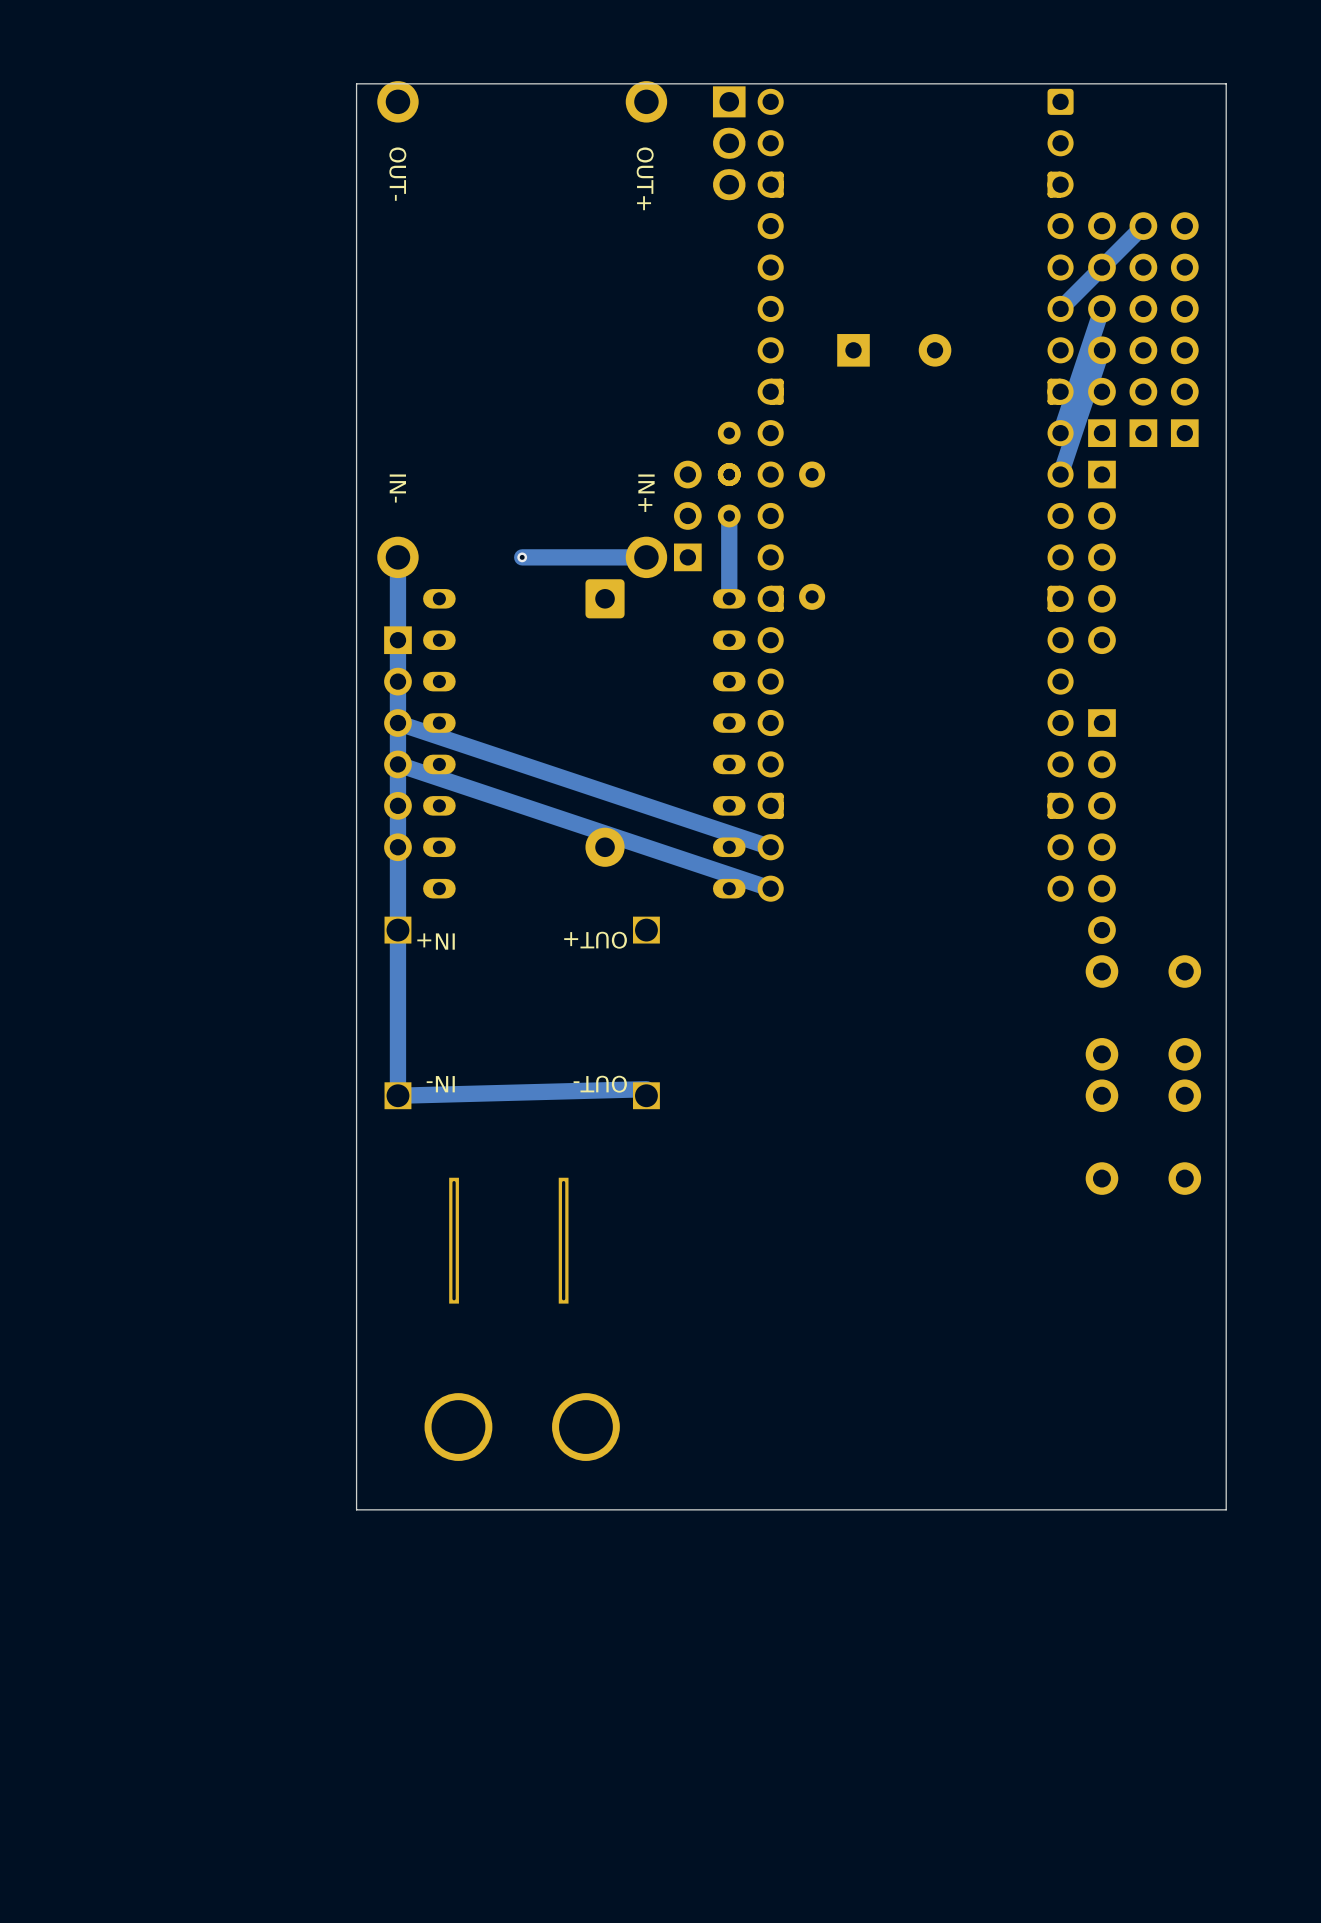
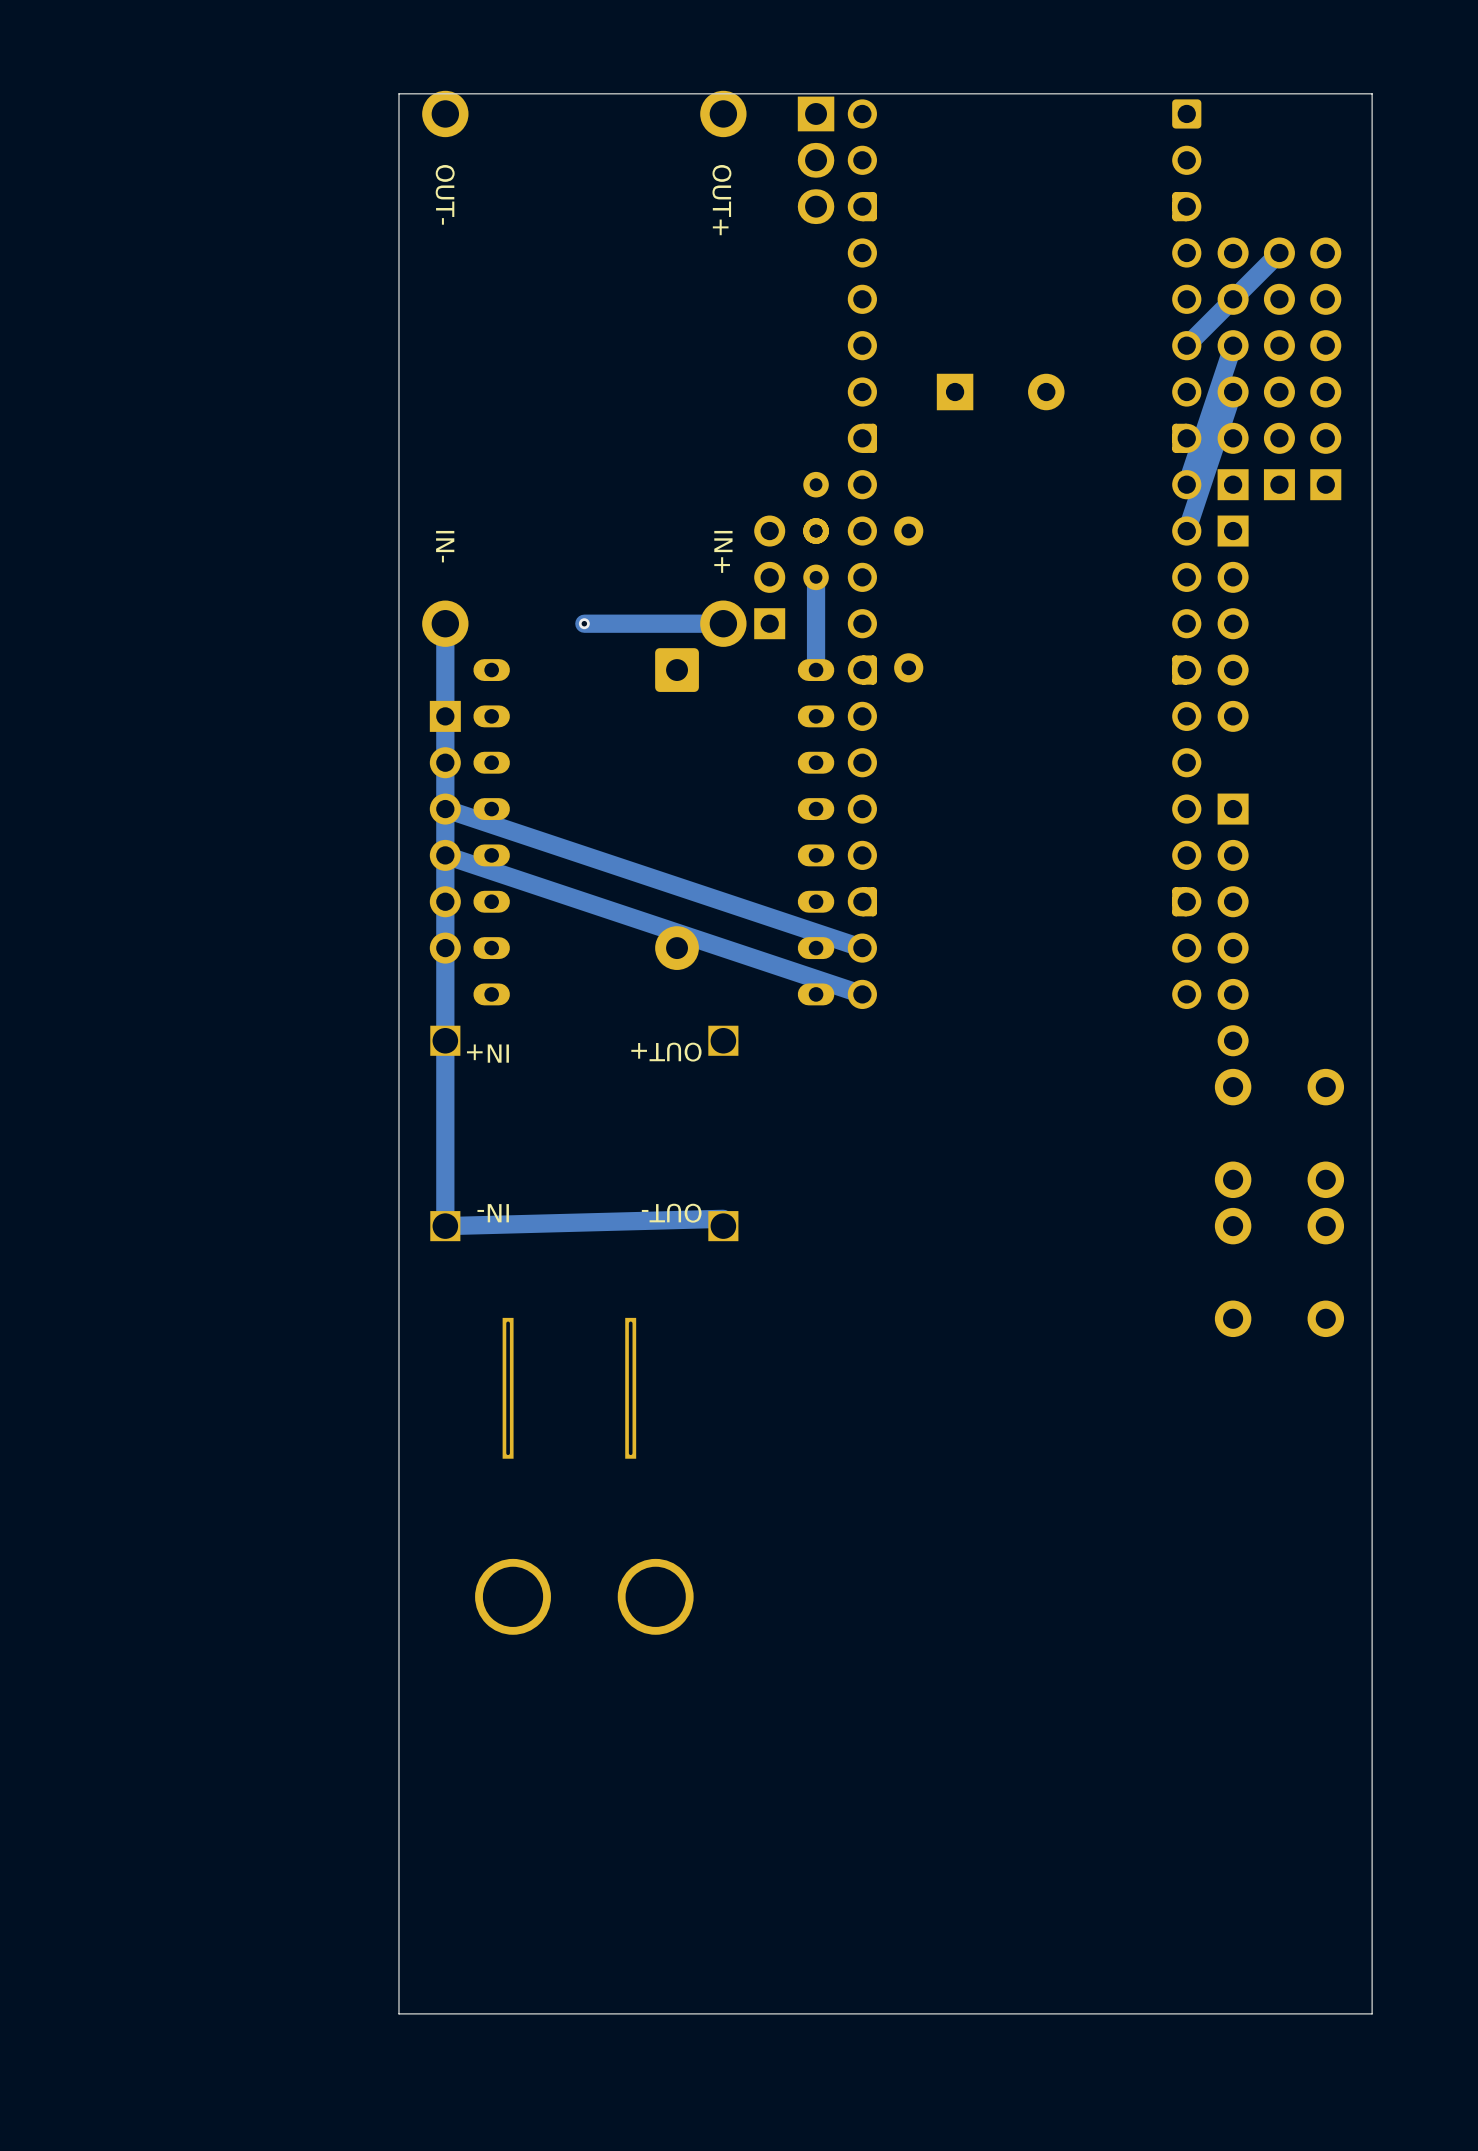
board edge: (1226, 1509) (356, 1509) -> (1372, 1689) (1372, 2013) (398, 2013) (398, 1689)

